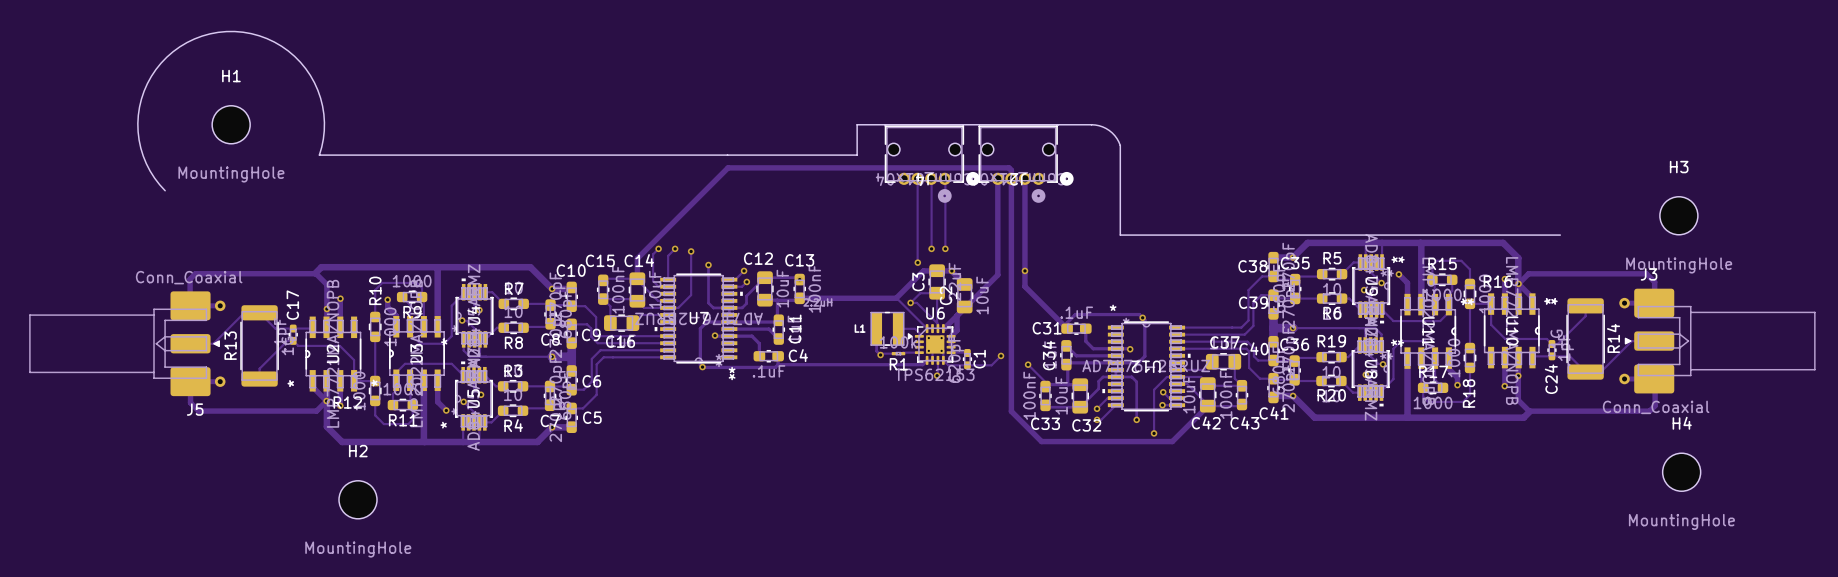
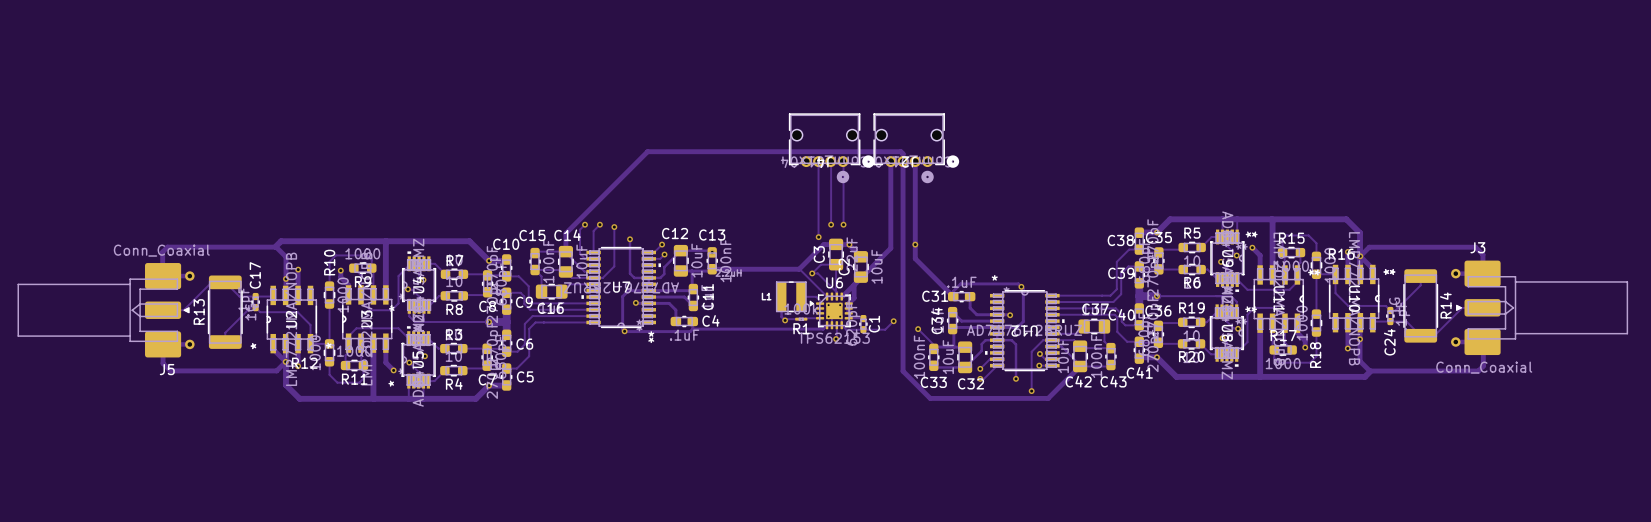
H1: MountingHole (231, 124) -> none
board edge: (165, 190) (150, 171) (140, 148) (138, 115) (144, 91) (155, 69) (179, 46) (202, 36) (234, 31) (259, 35) (281, 46) (300, 62) (310, 75) (317, 90) (323, 114) (323, 139) (319, 155) (857, 155) (857, 124) (1095, 125) (1112, 132) (1120, 145) (1120, 235) (1560, 235) -> none
H3: MountingHole (1678, 215) -> none
H4: MountingHole (1681, 472) -> none
H2: MountingHole (358, 499) -> none

